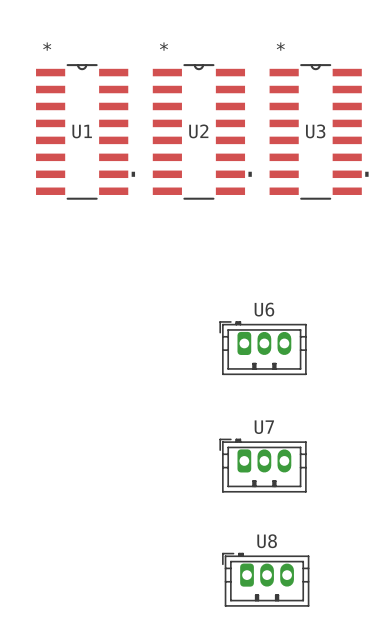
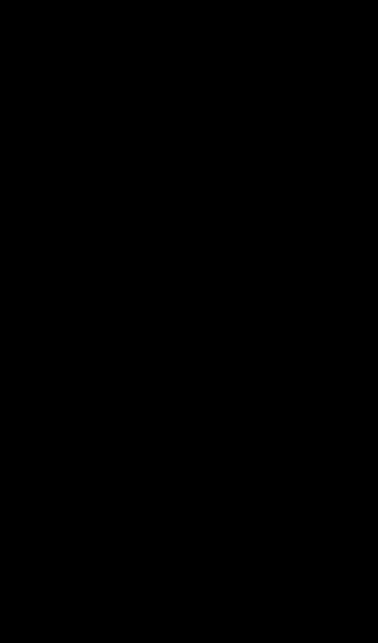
U1: (85, 131) -> none
U2: (202, 131) -> none
U3: (319, 131) -> none
U6: (263, 348) -> none
U7: (263, 465) -> none
U8: (265, 579) -> none

